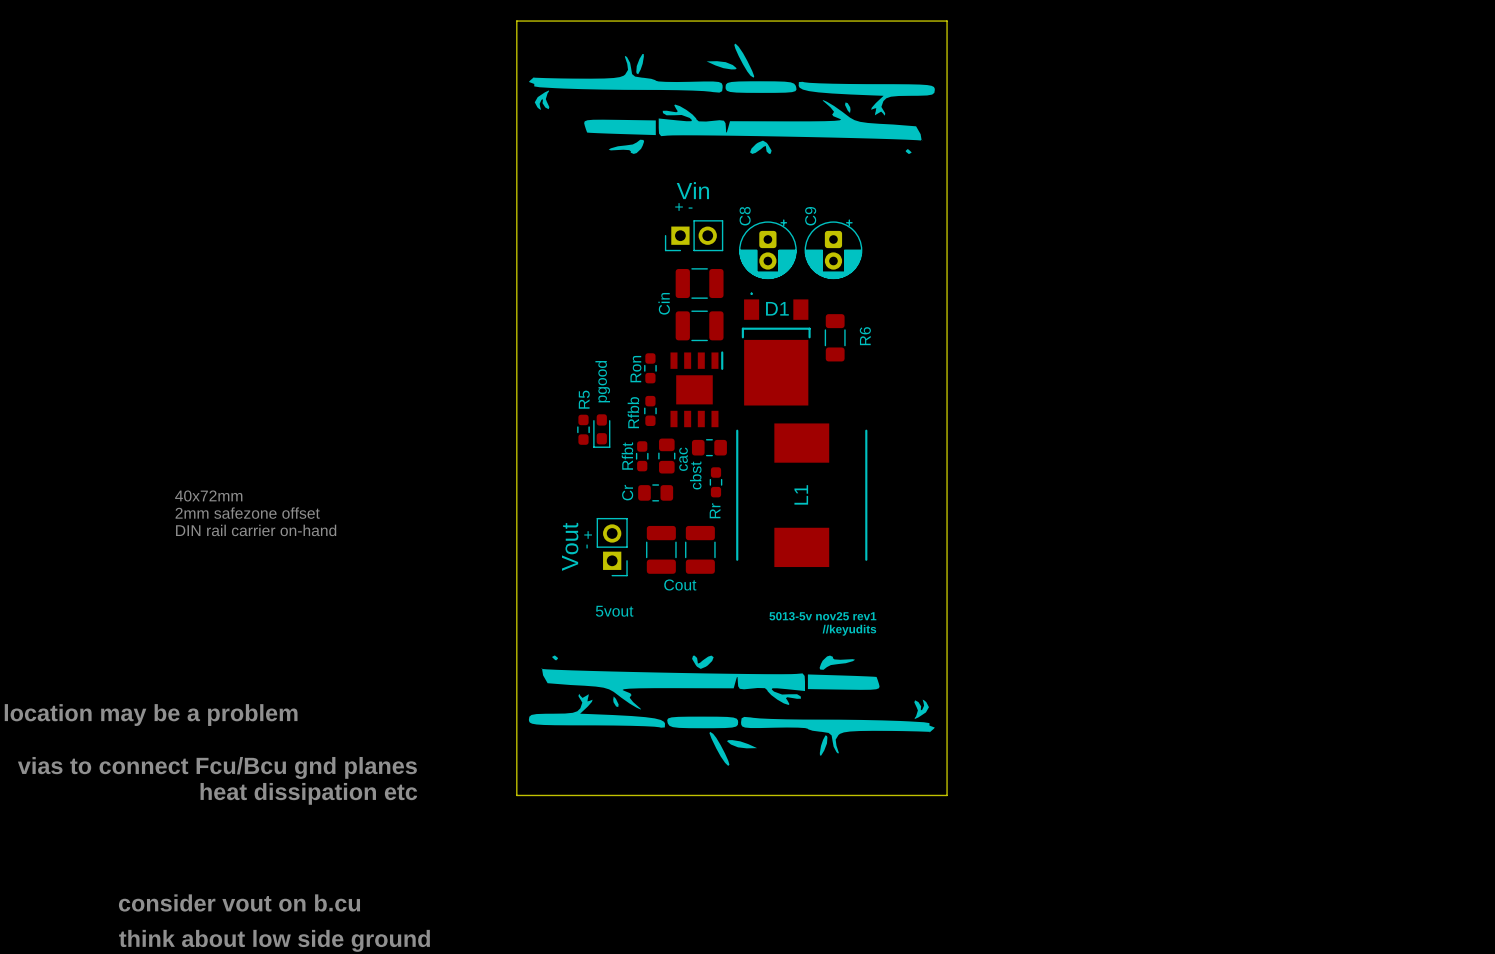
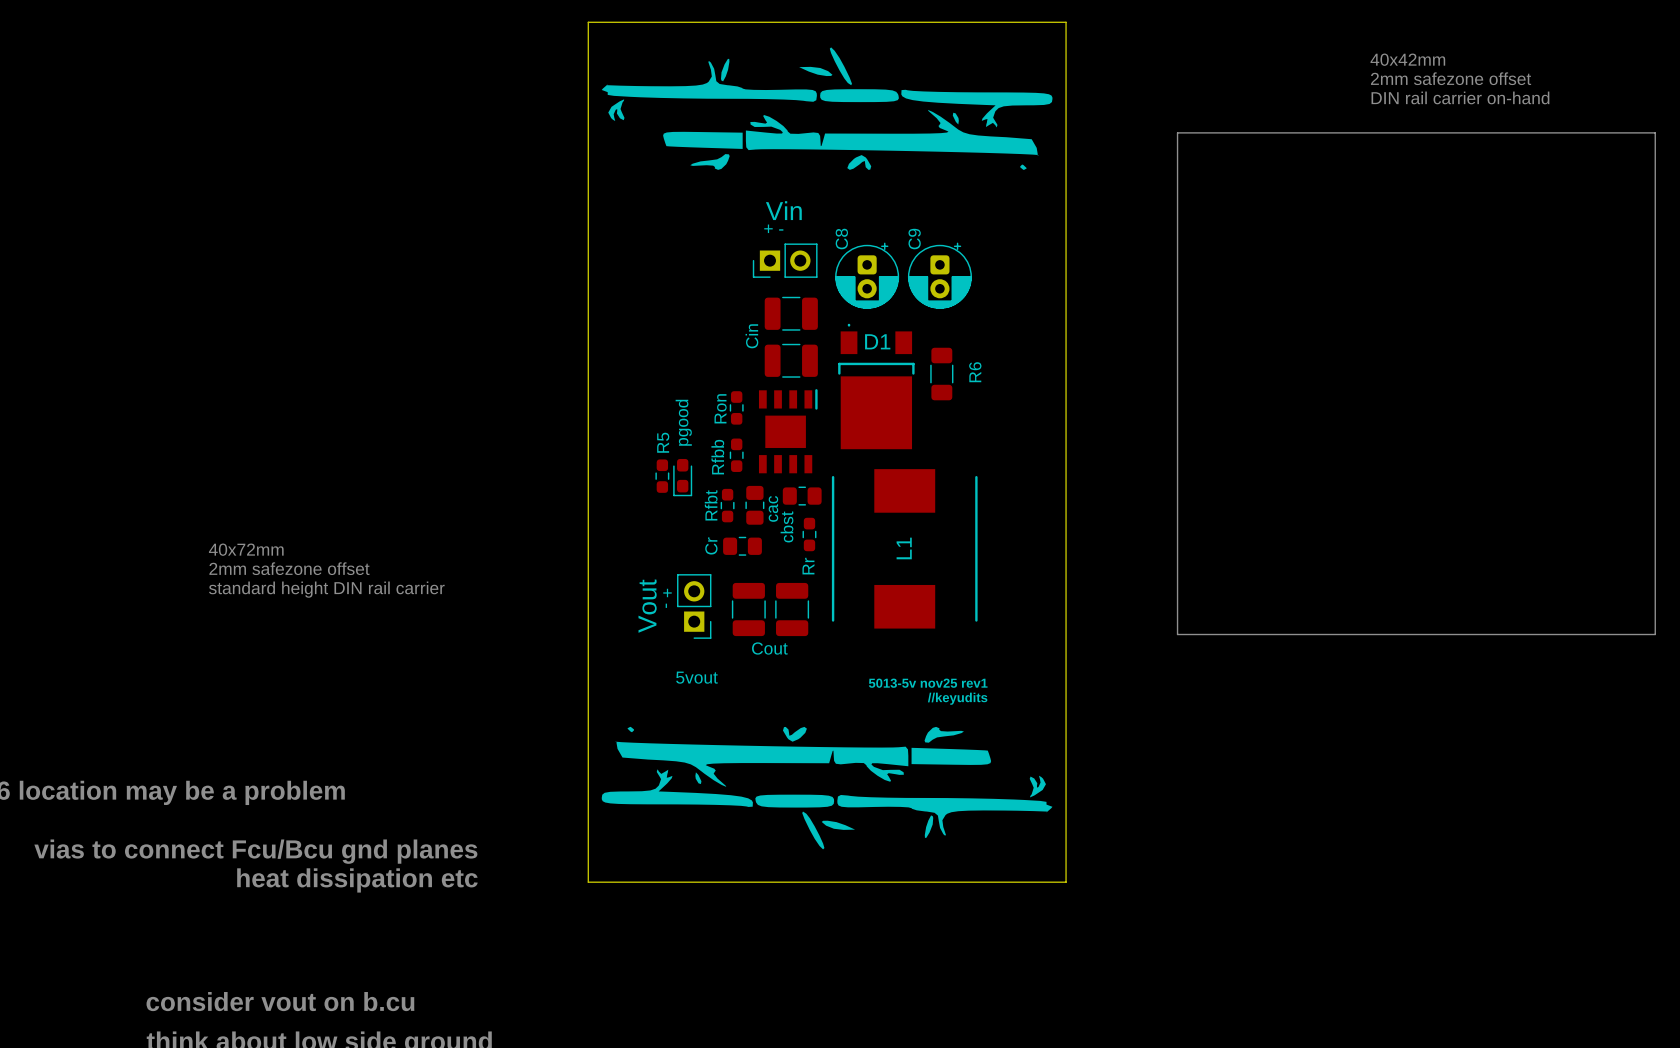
text: none -> 40x42mm (1407, 59)
text: none -> 2mm safezone offset (1451, 78)
text: none -> DIN rail carrier on-hand (1460, 97)
line: none -> (1177, 132) (1655, 132) (1655, 634) (1177, 634) (1177, 132)
text: DIN rail carrier on-hand (256, 530) -> standard height DIN rail carrier (326, 589)

